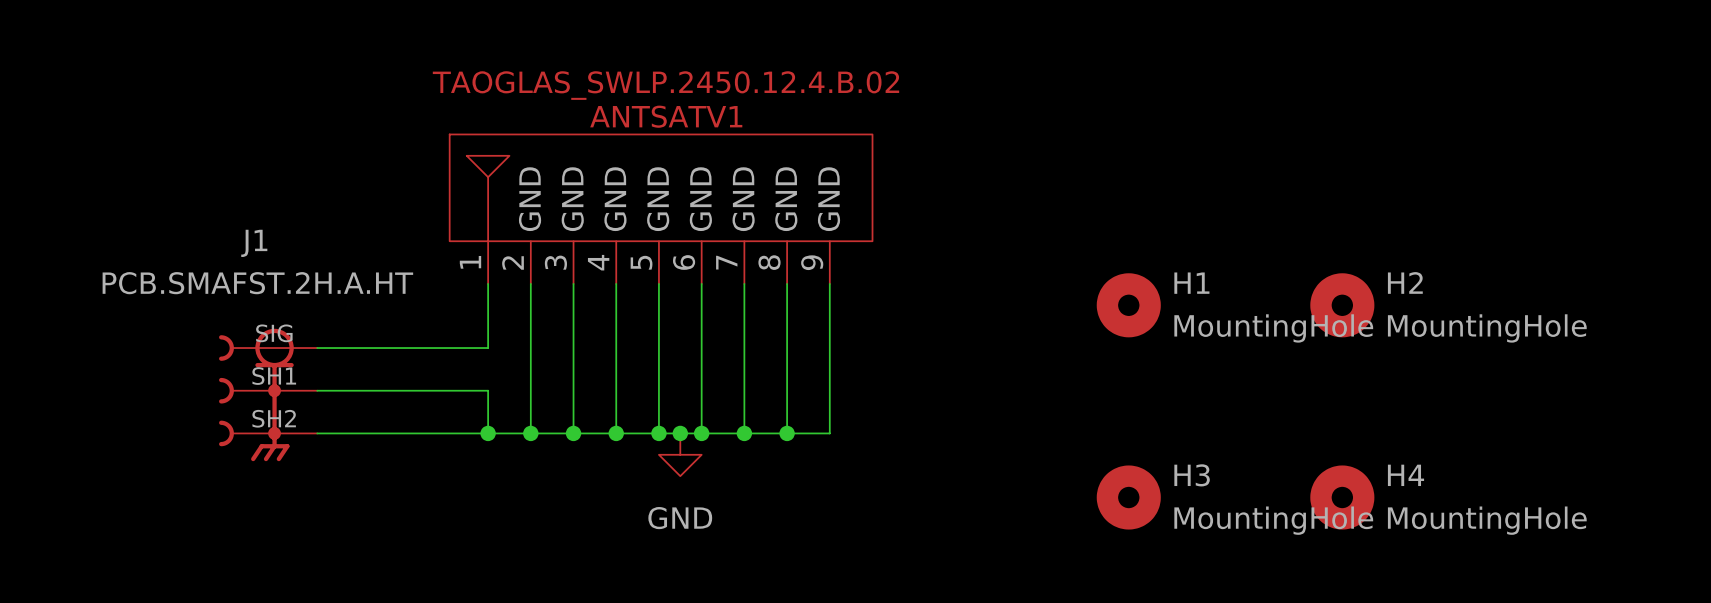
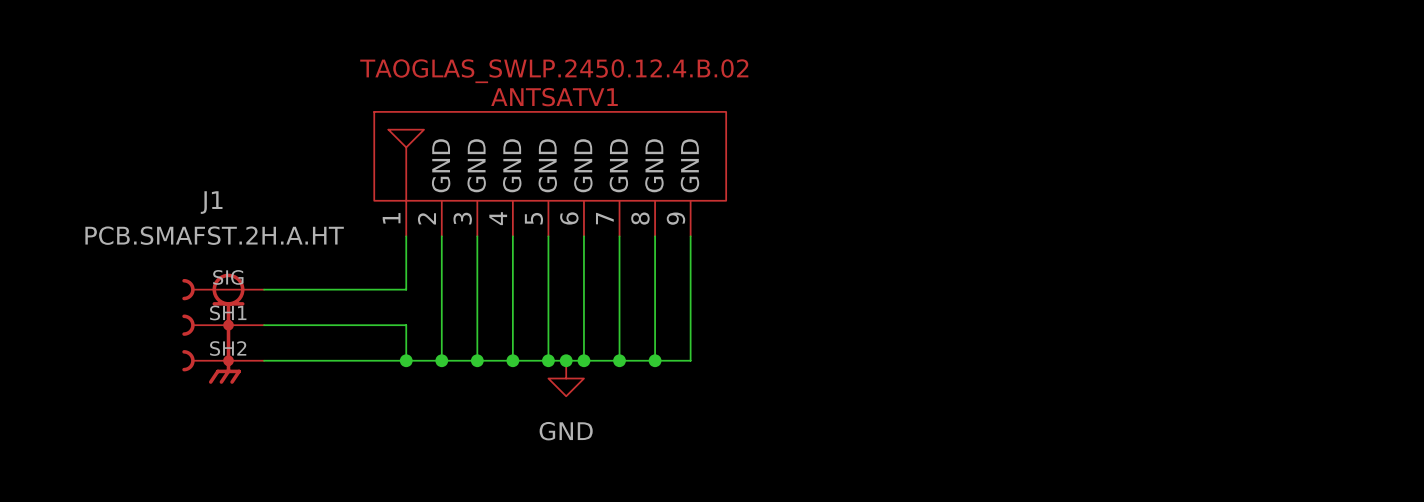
H1: MountingHole (1128, 305) -> none
H2: MountingHole (1342, 305) -> none
H3: MountingHole (1128, 497) -> none
H4: MountingHole (1342, 497) -> none

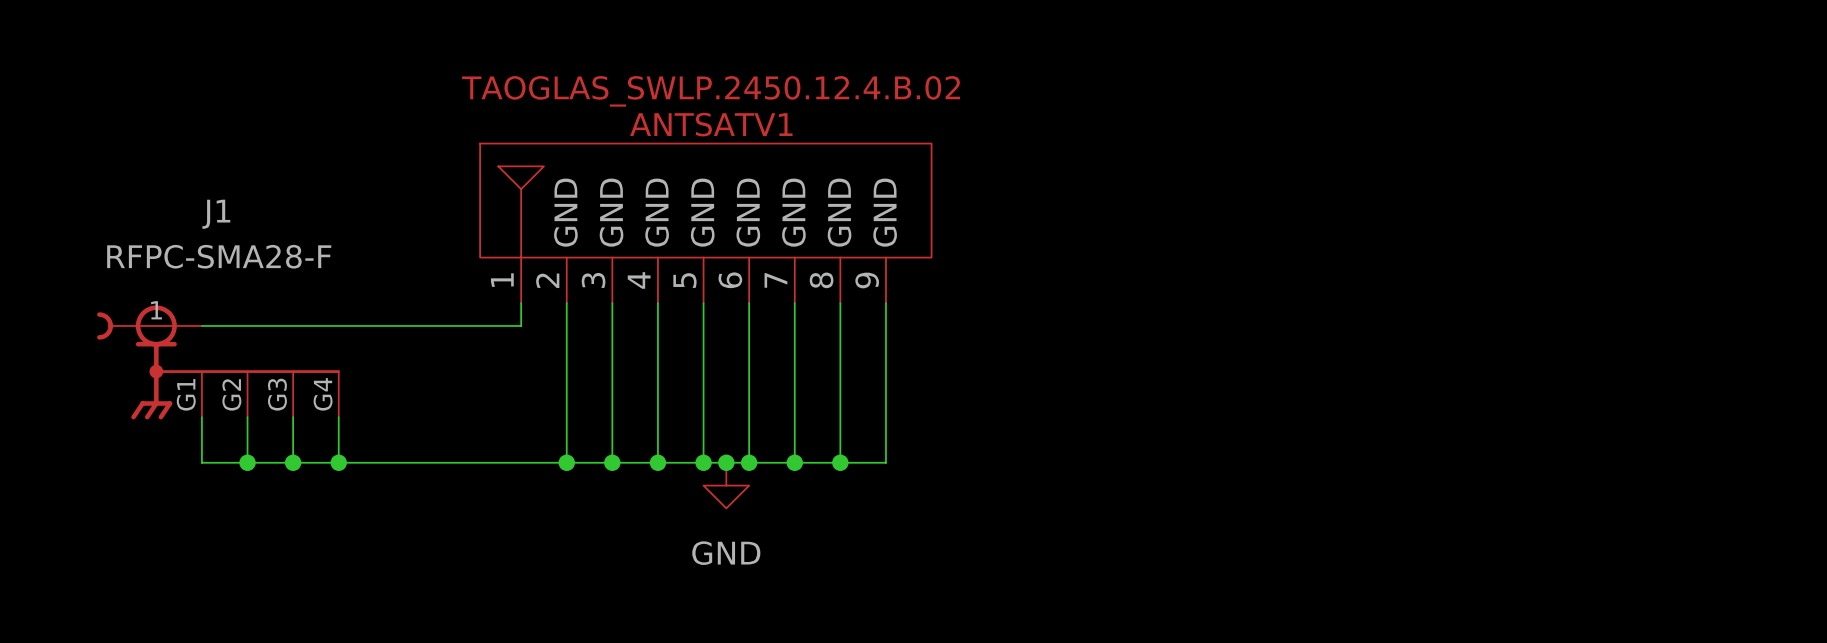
J1 value: PCB.SMAFST.2H.A.HT (214, 235) -> RFPC-SMA28-F (219, 256)
wire: (406, 254) (406, 289) (264, 289) -> (521, 325) (201, 325)
J1 symbol: [182, 273, 265, 384] -> [97, 305, 341, 420]
wire: none -> (247, 417) (247, 462)
wire: (264, 325) (406, 325) (406, 360) -> (338, 417) (338, 462) (201, 462) (201, 417)
junction: none -> (247, 462)
junction: none -> (293, 462)
junction: none -> (338, 462)
junction: (406, 360) -> none

